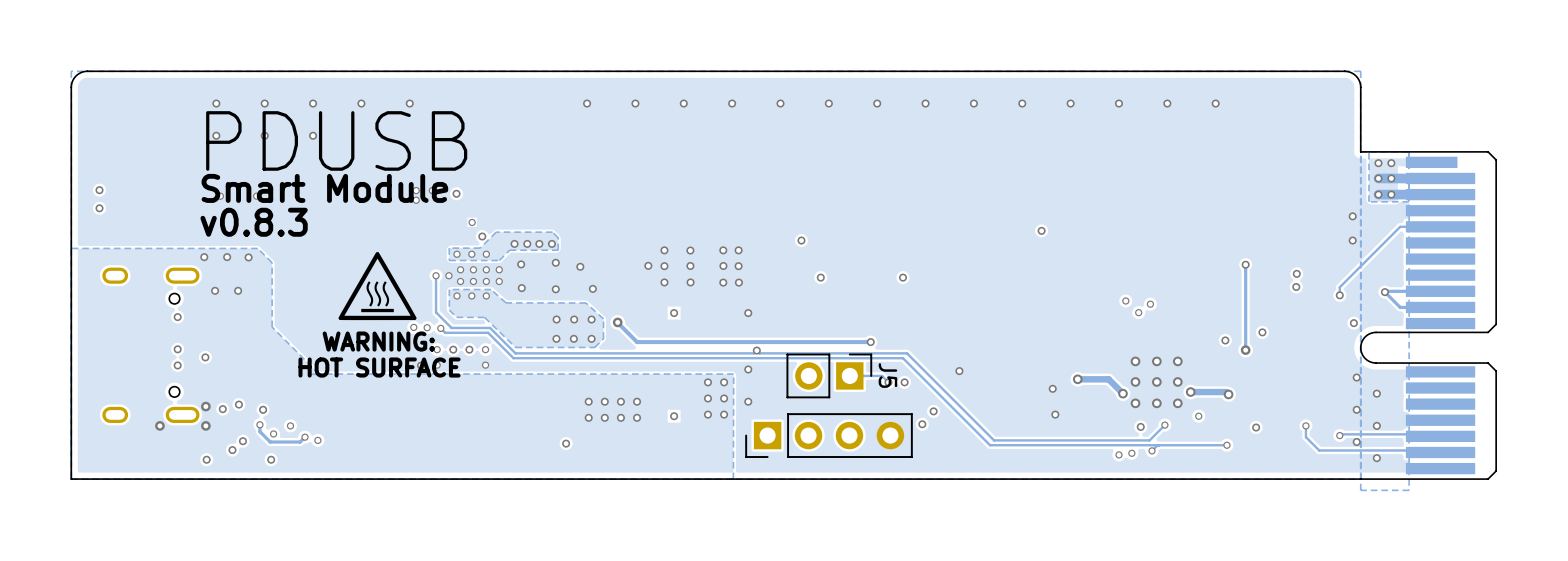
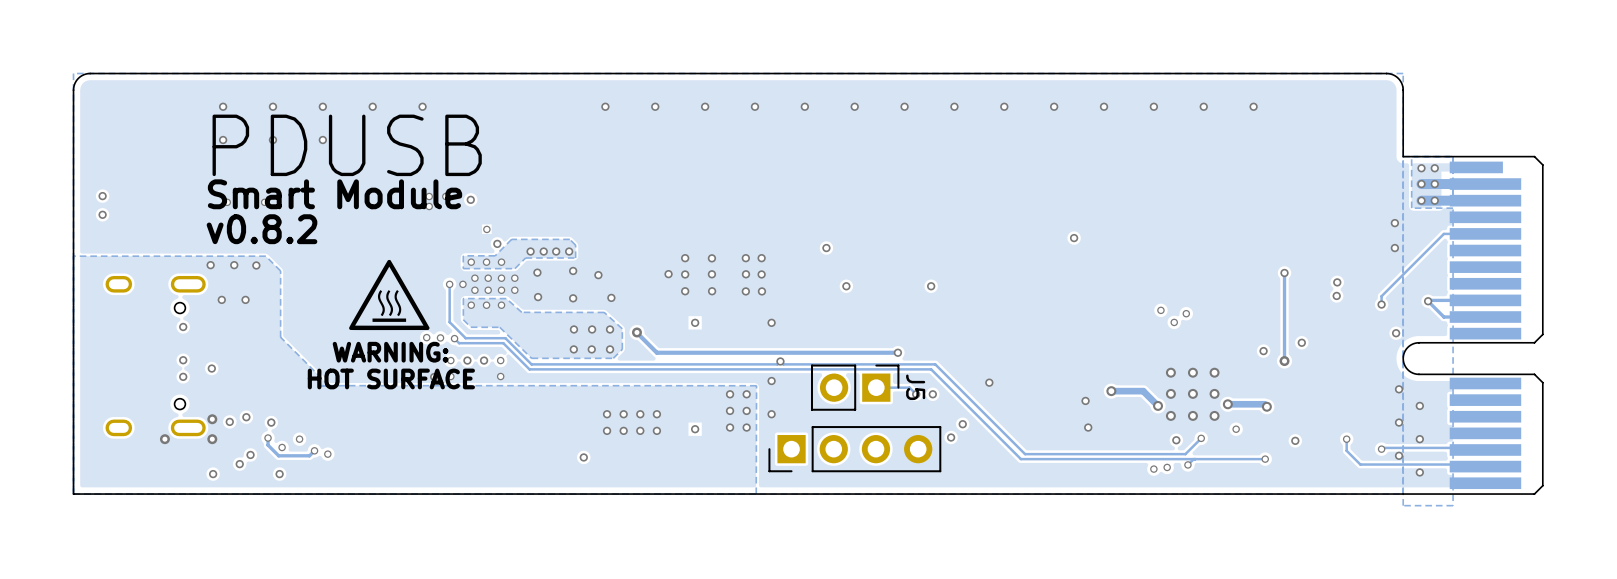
text: v0.8.3 (254, 222) -> v0.8.2 (262, 229)

